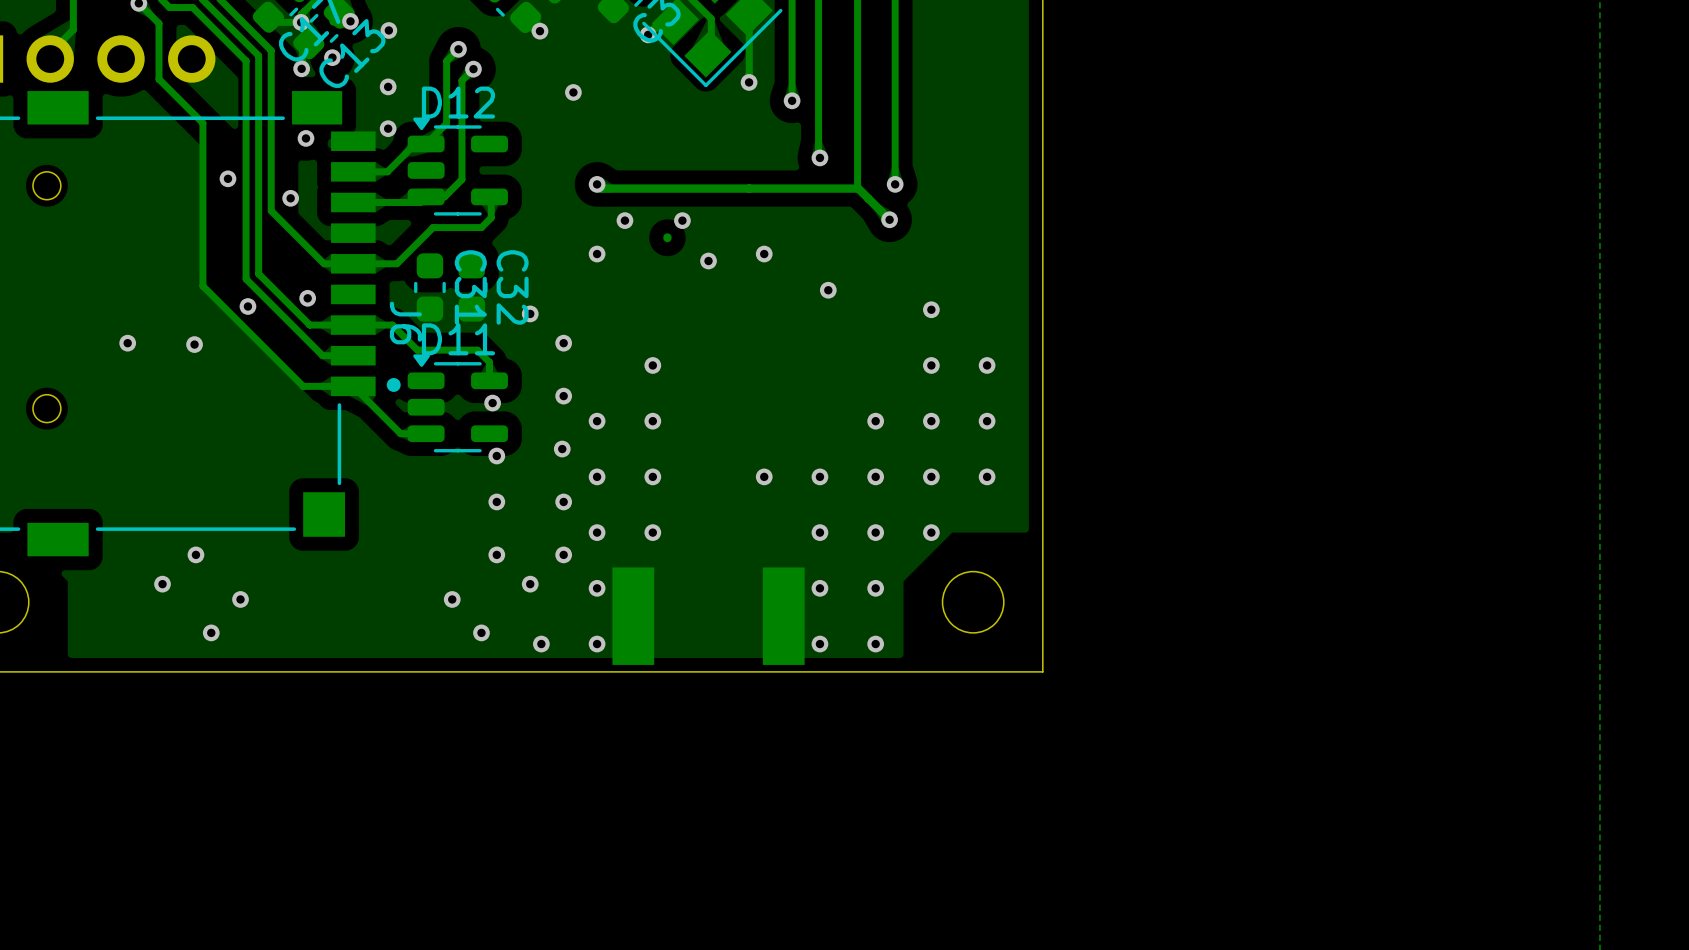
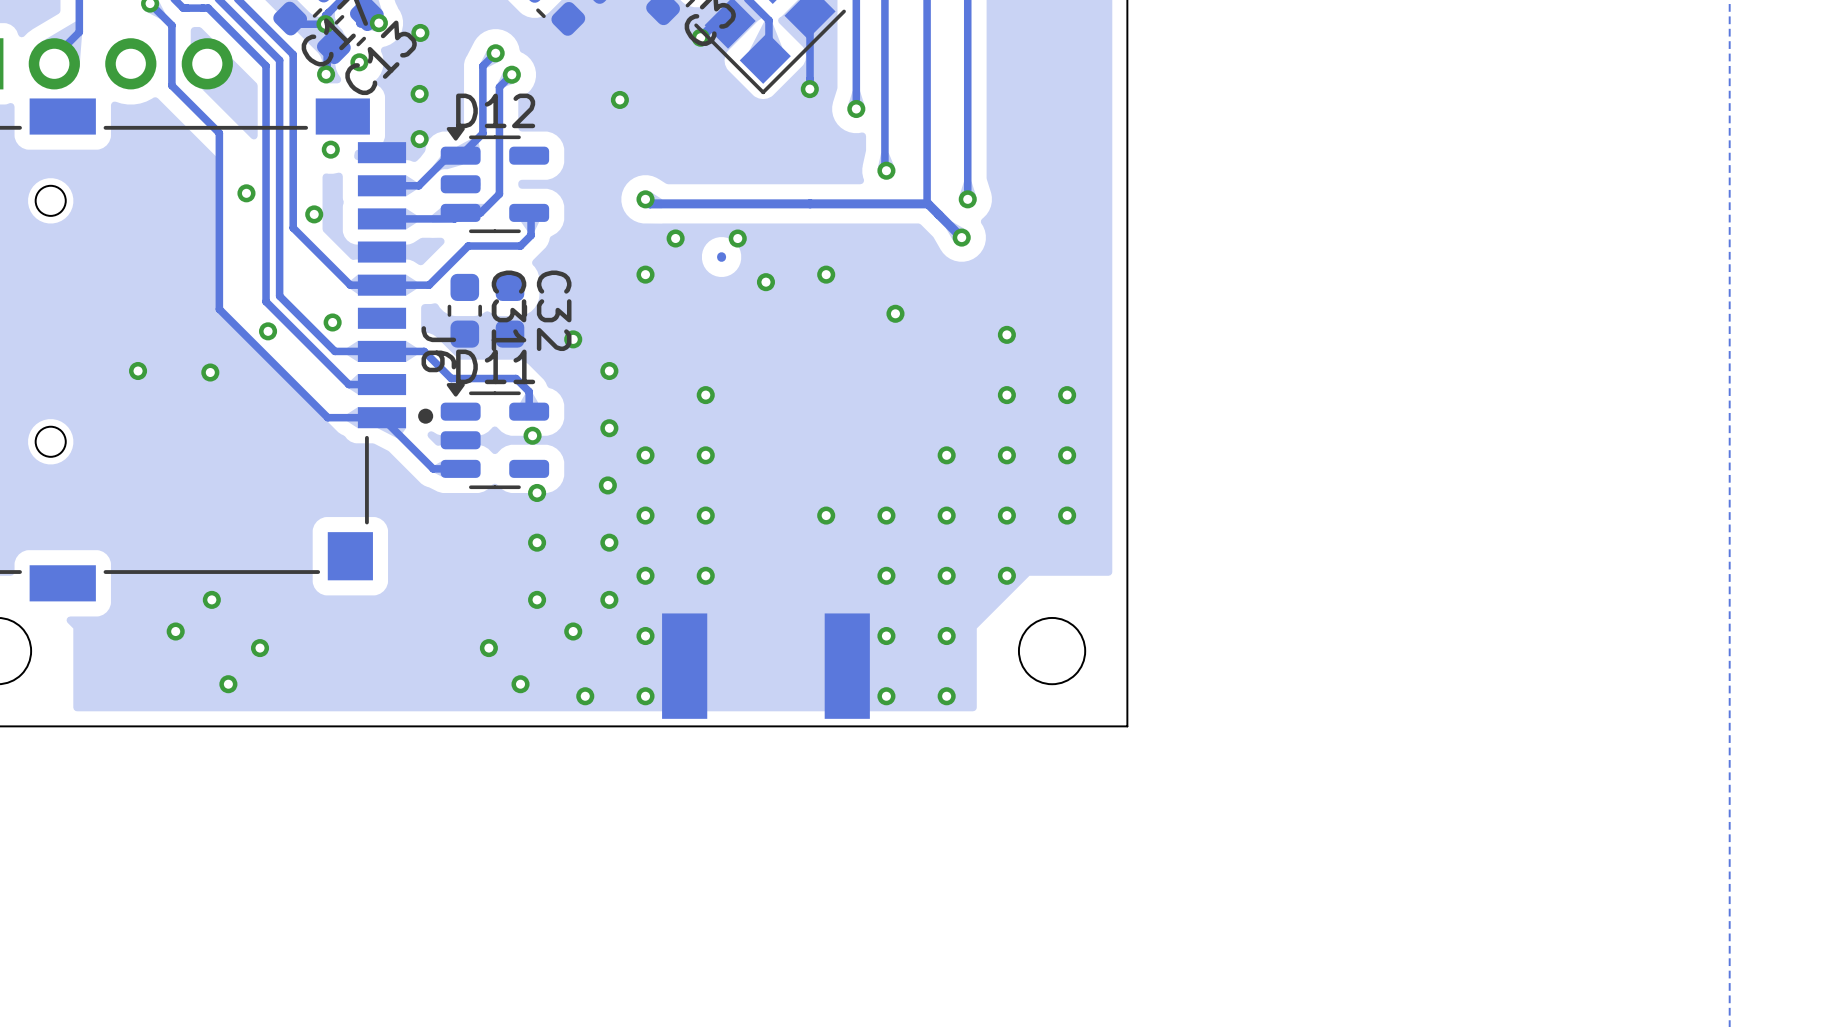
via: (539, 31) -> none

